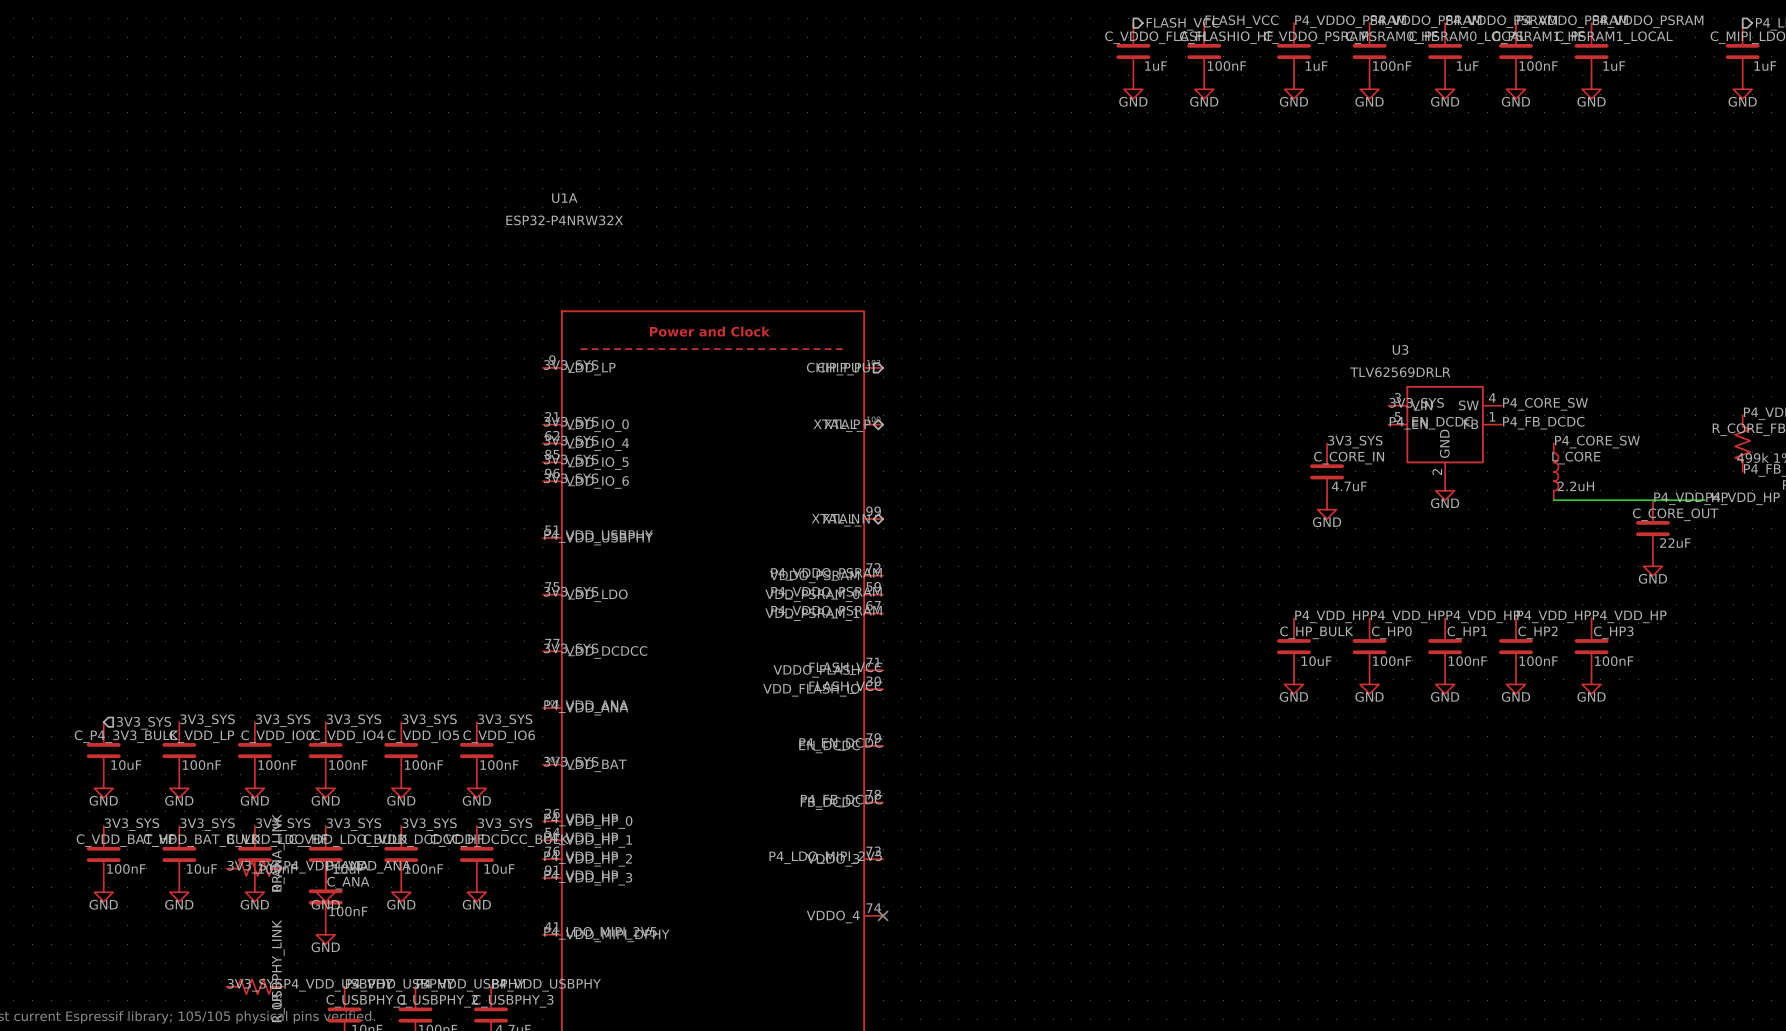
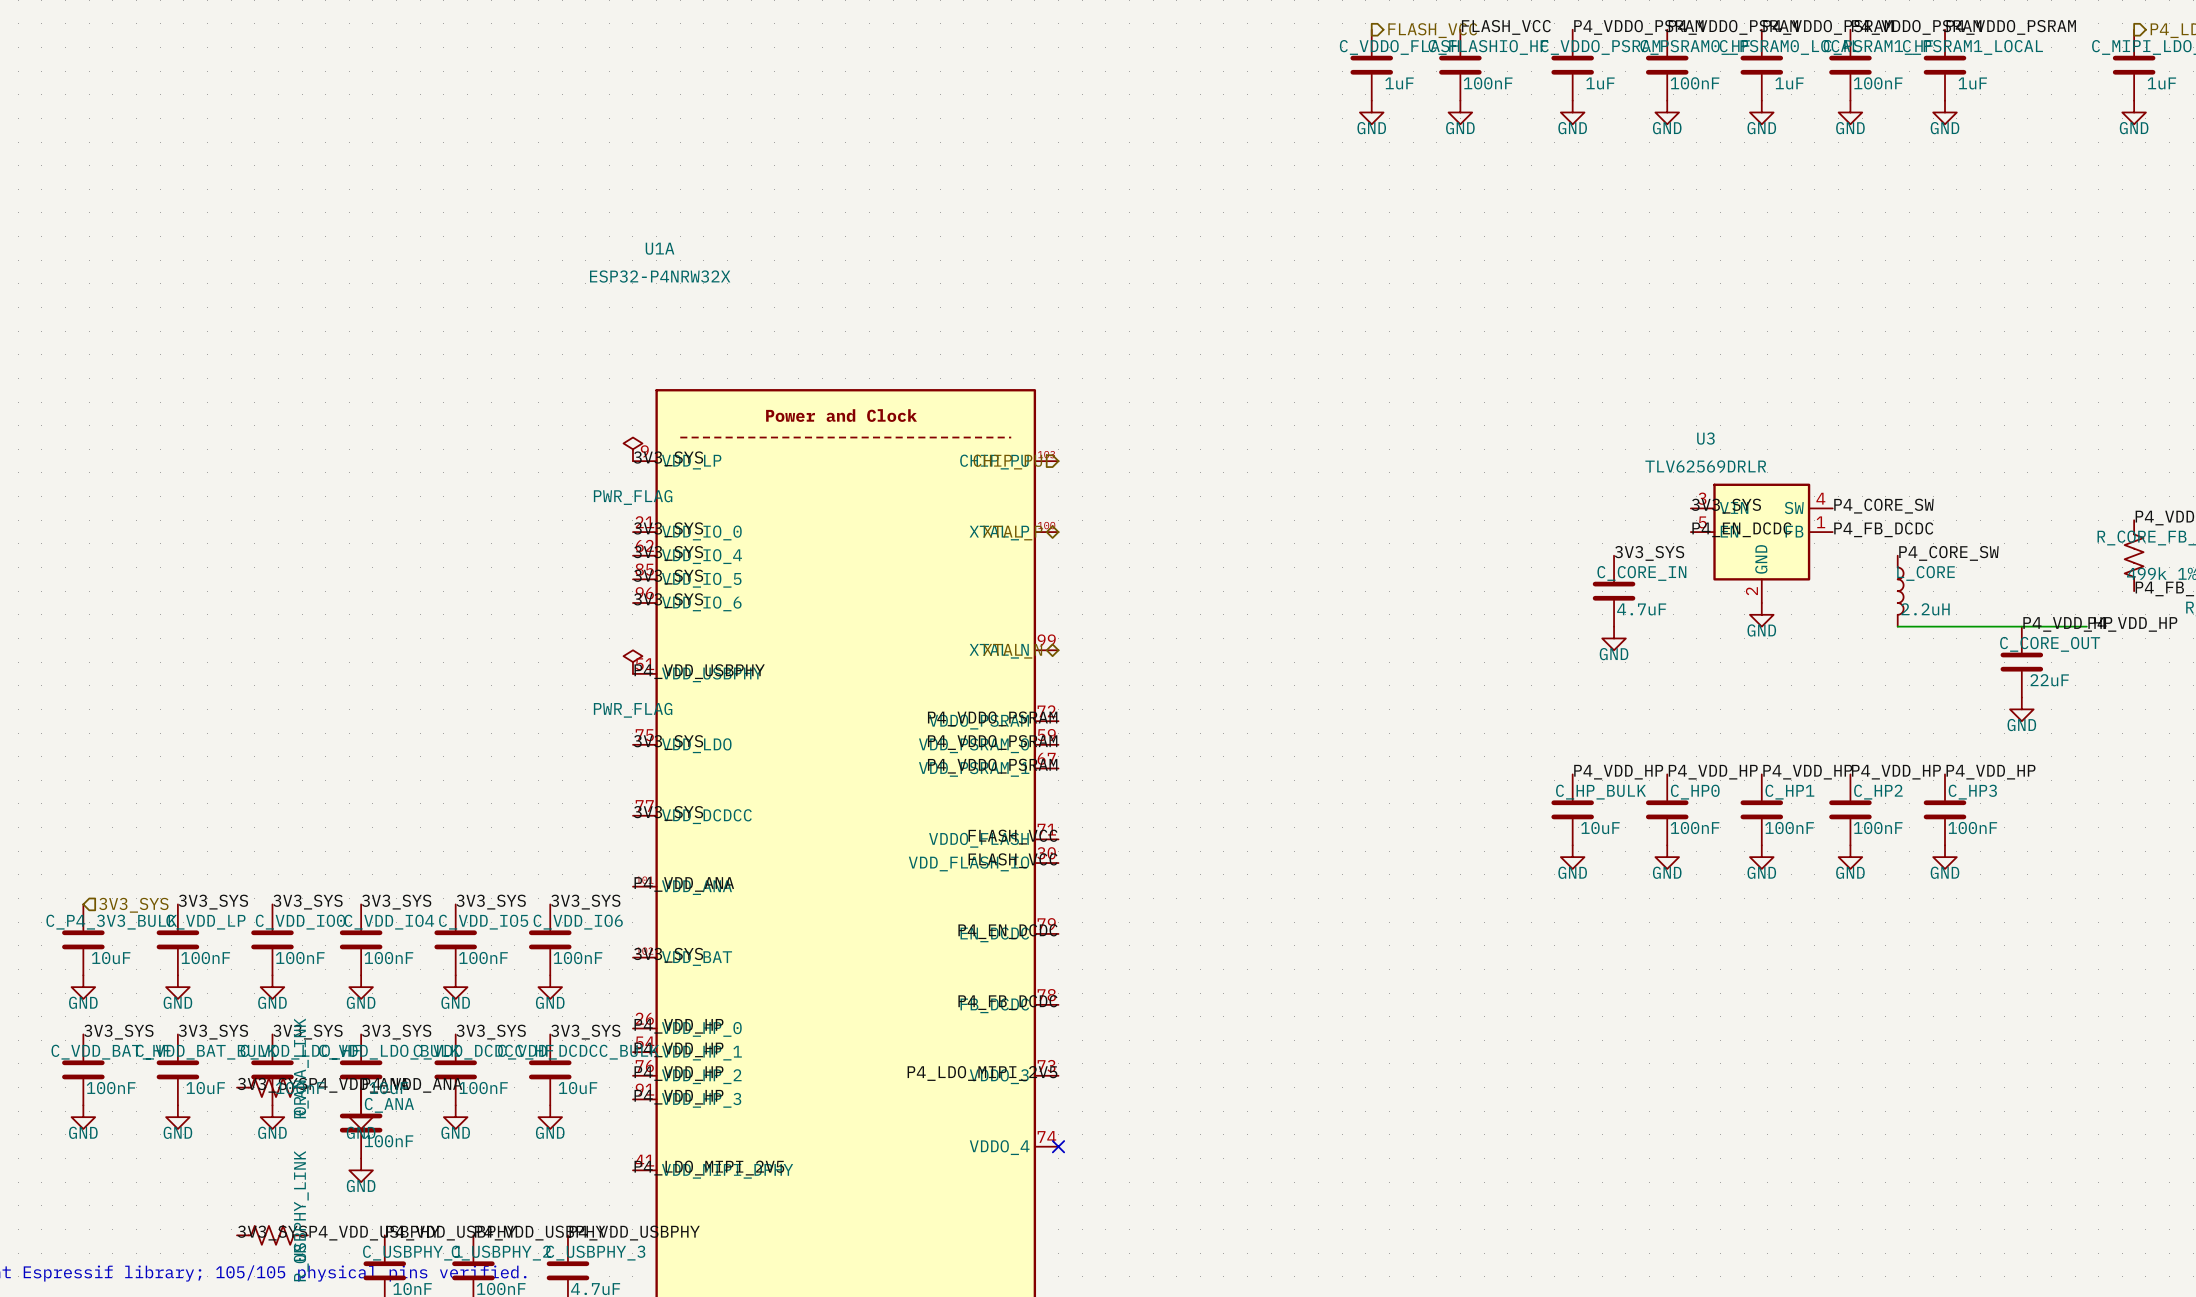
power symbol: none -> PWR_FLAG (632, 449)
power symbol: none -> PWR_FLAG (632, 662)

